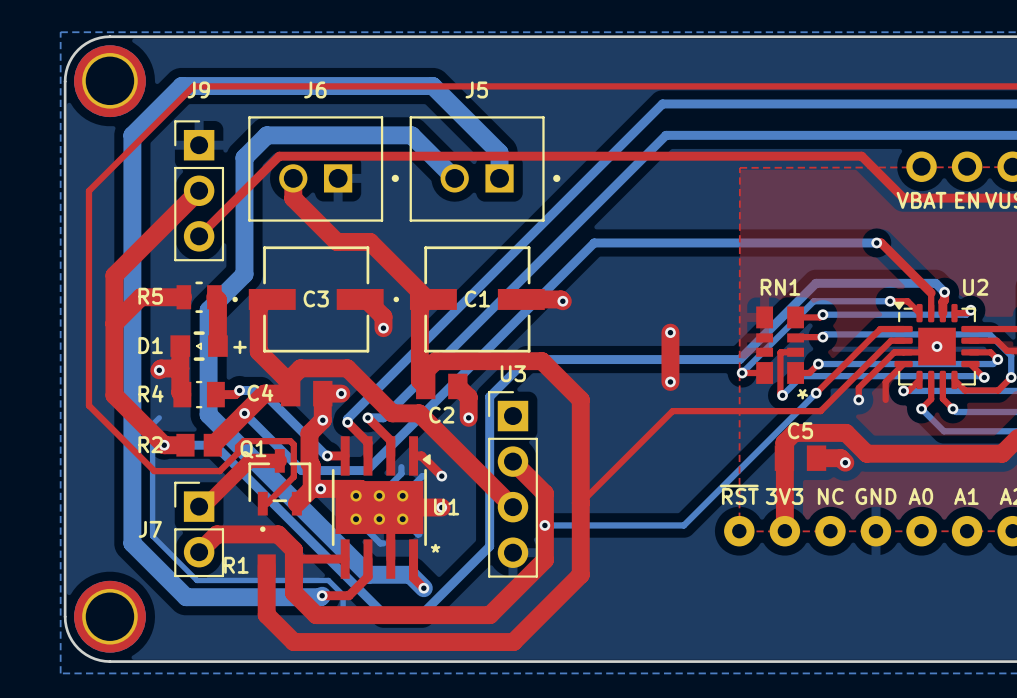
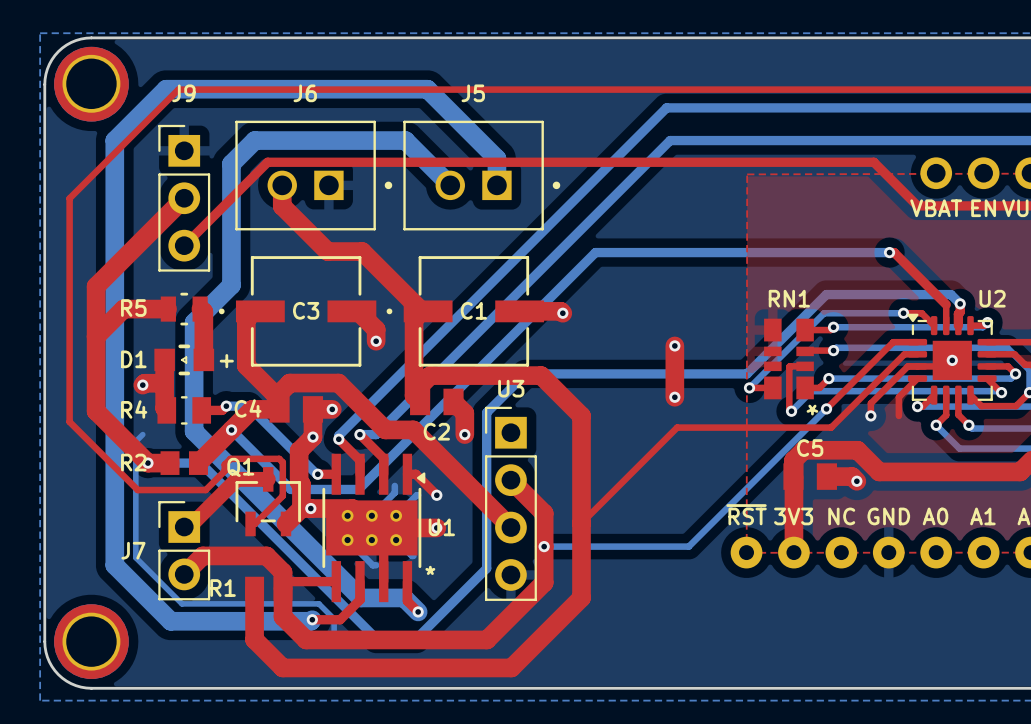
Q1 footprint: [248, 449, 312, 532] -> [235, 467, 301, 537]

